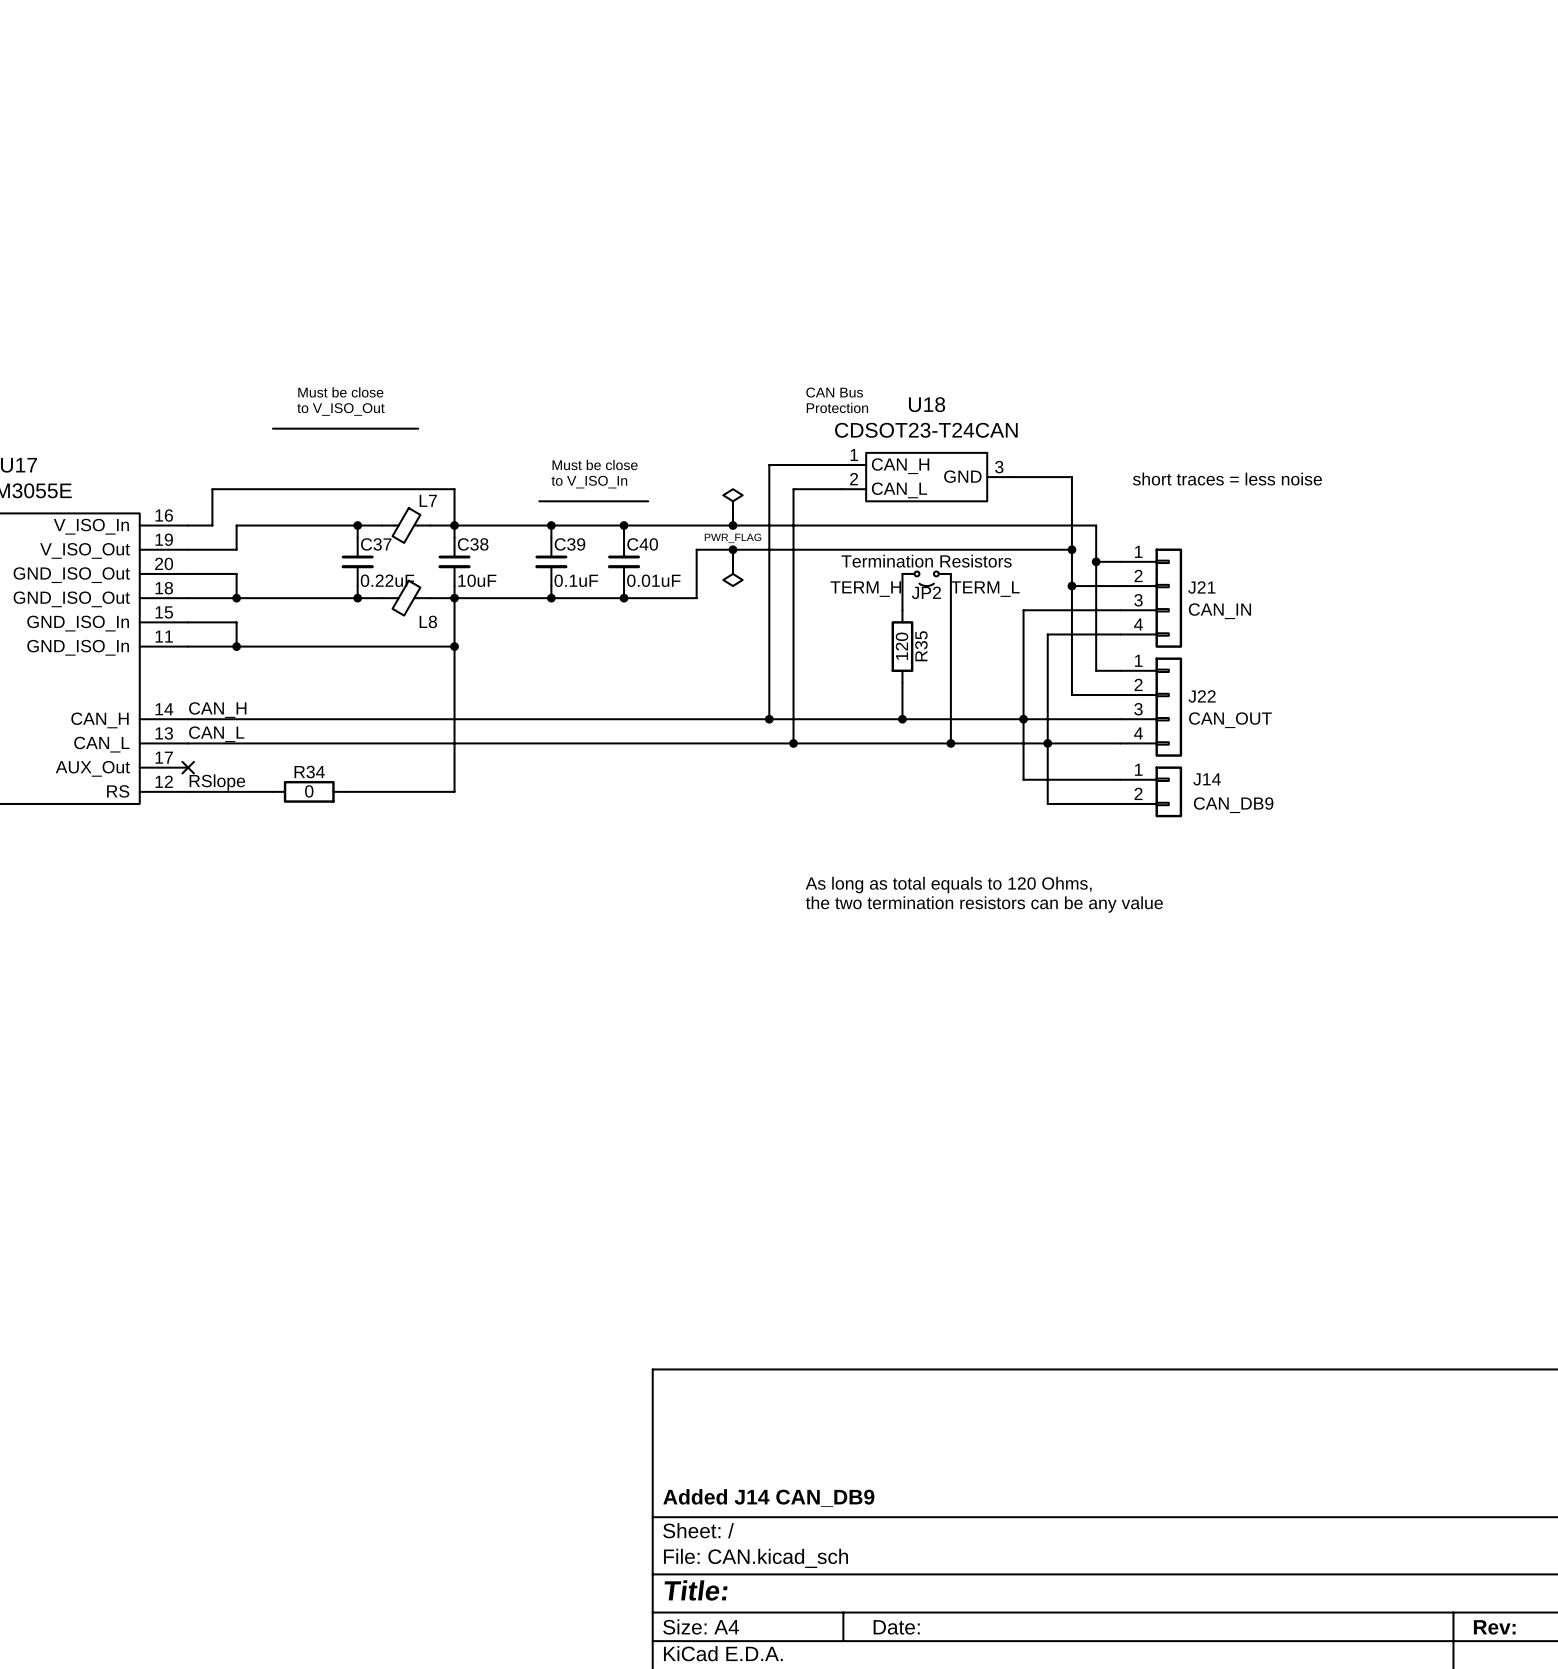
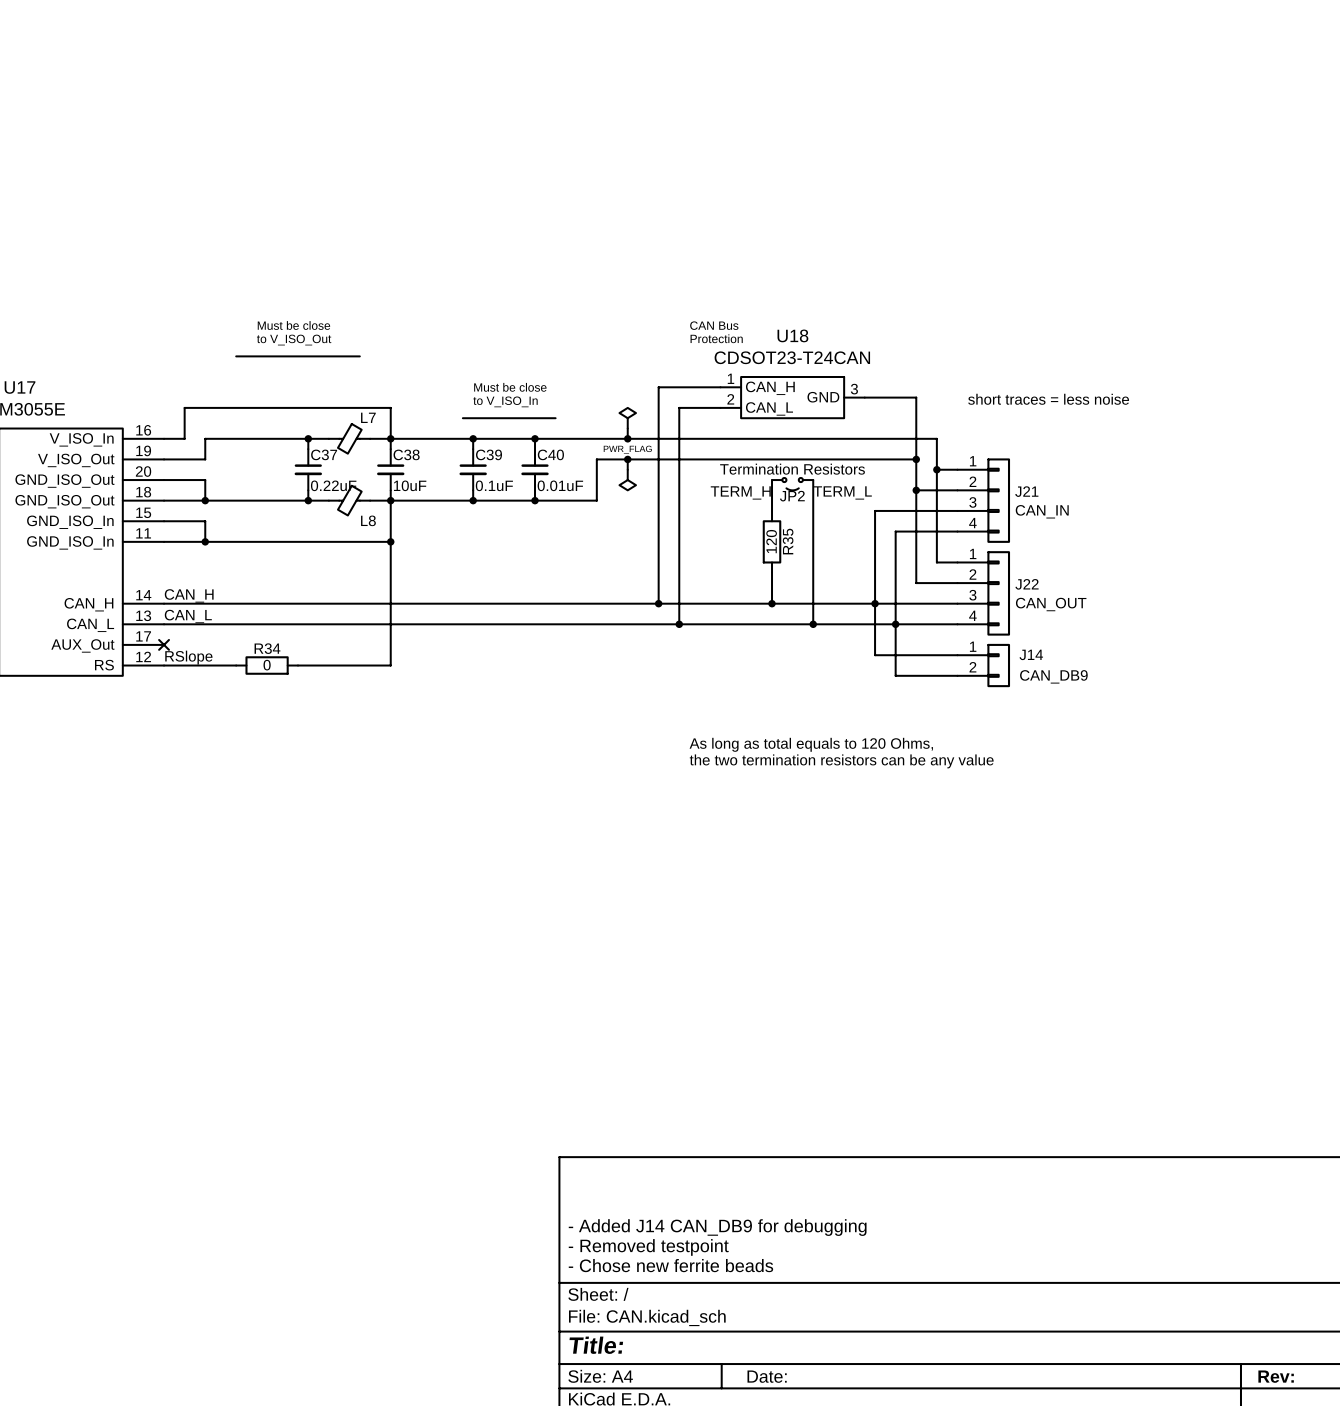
text: none -> - Added J14 CAN_DB9 for debugging (717, 1227)
text: none -> - Removed testpoint (648, 1247)
text: Added J14 CAN_DB9 (768, 1498) -> - Chose new ferrite beads (670, 1265)

